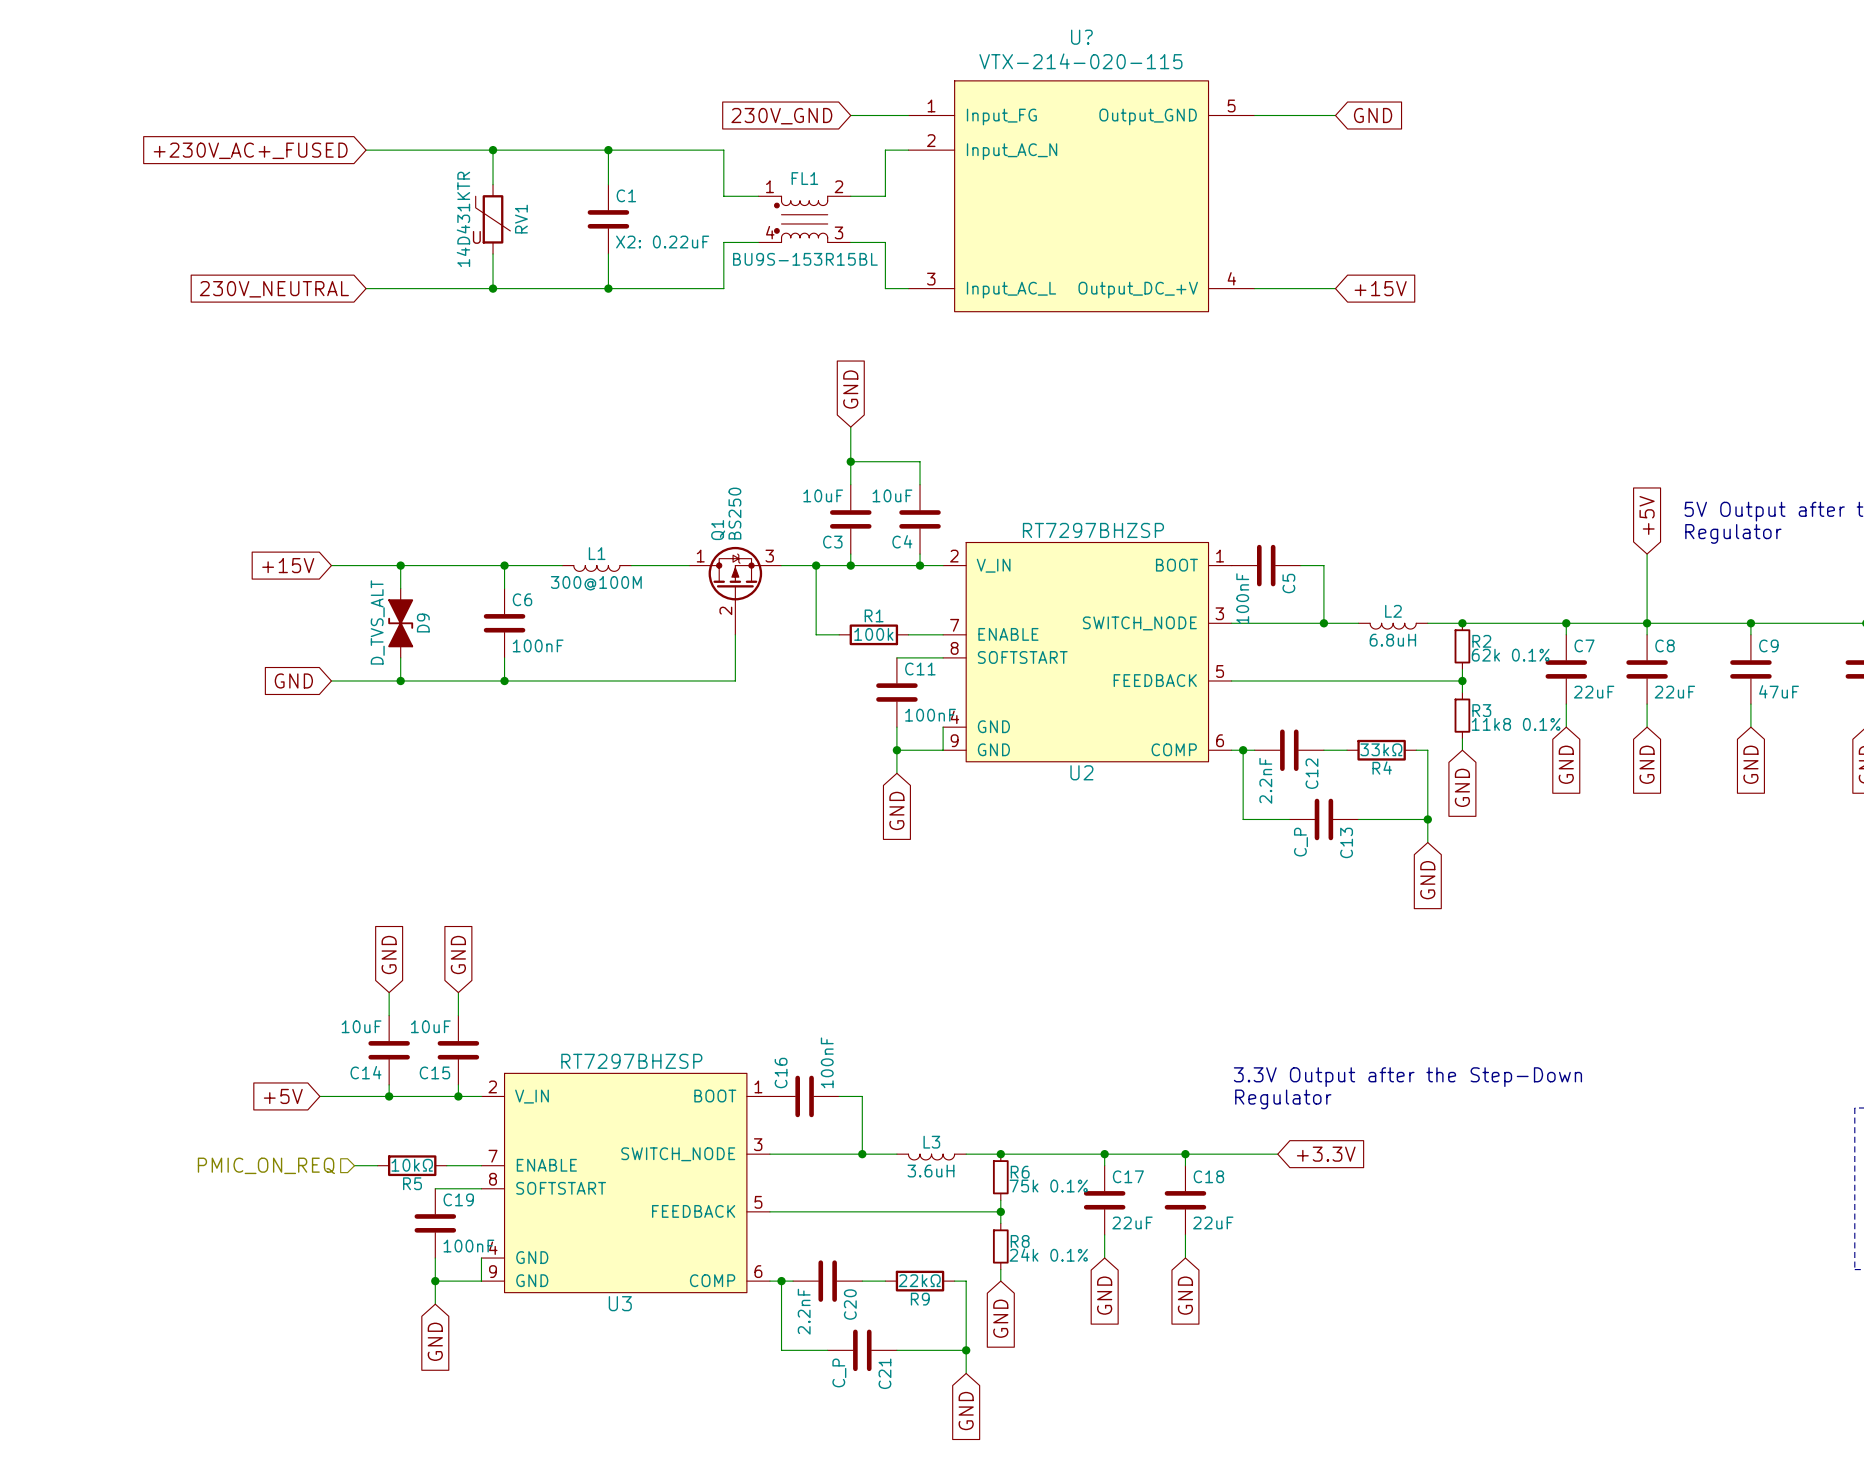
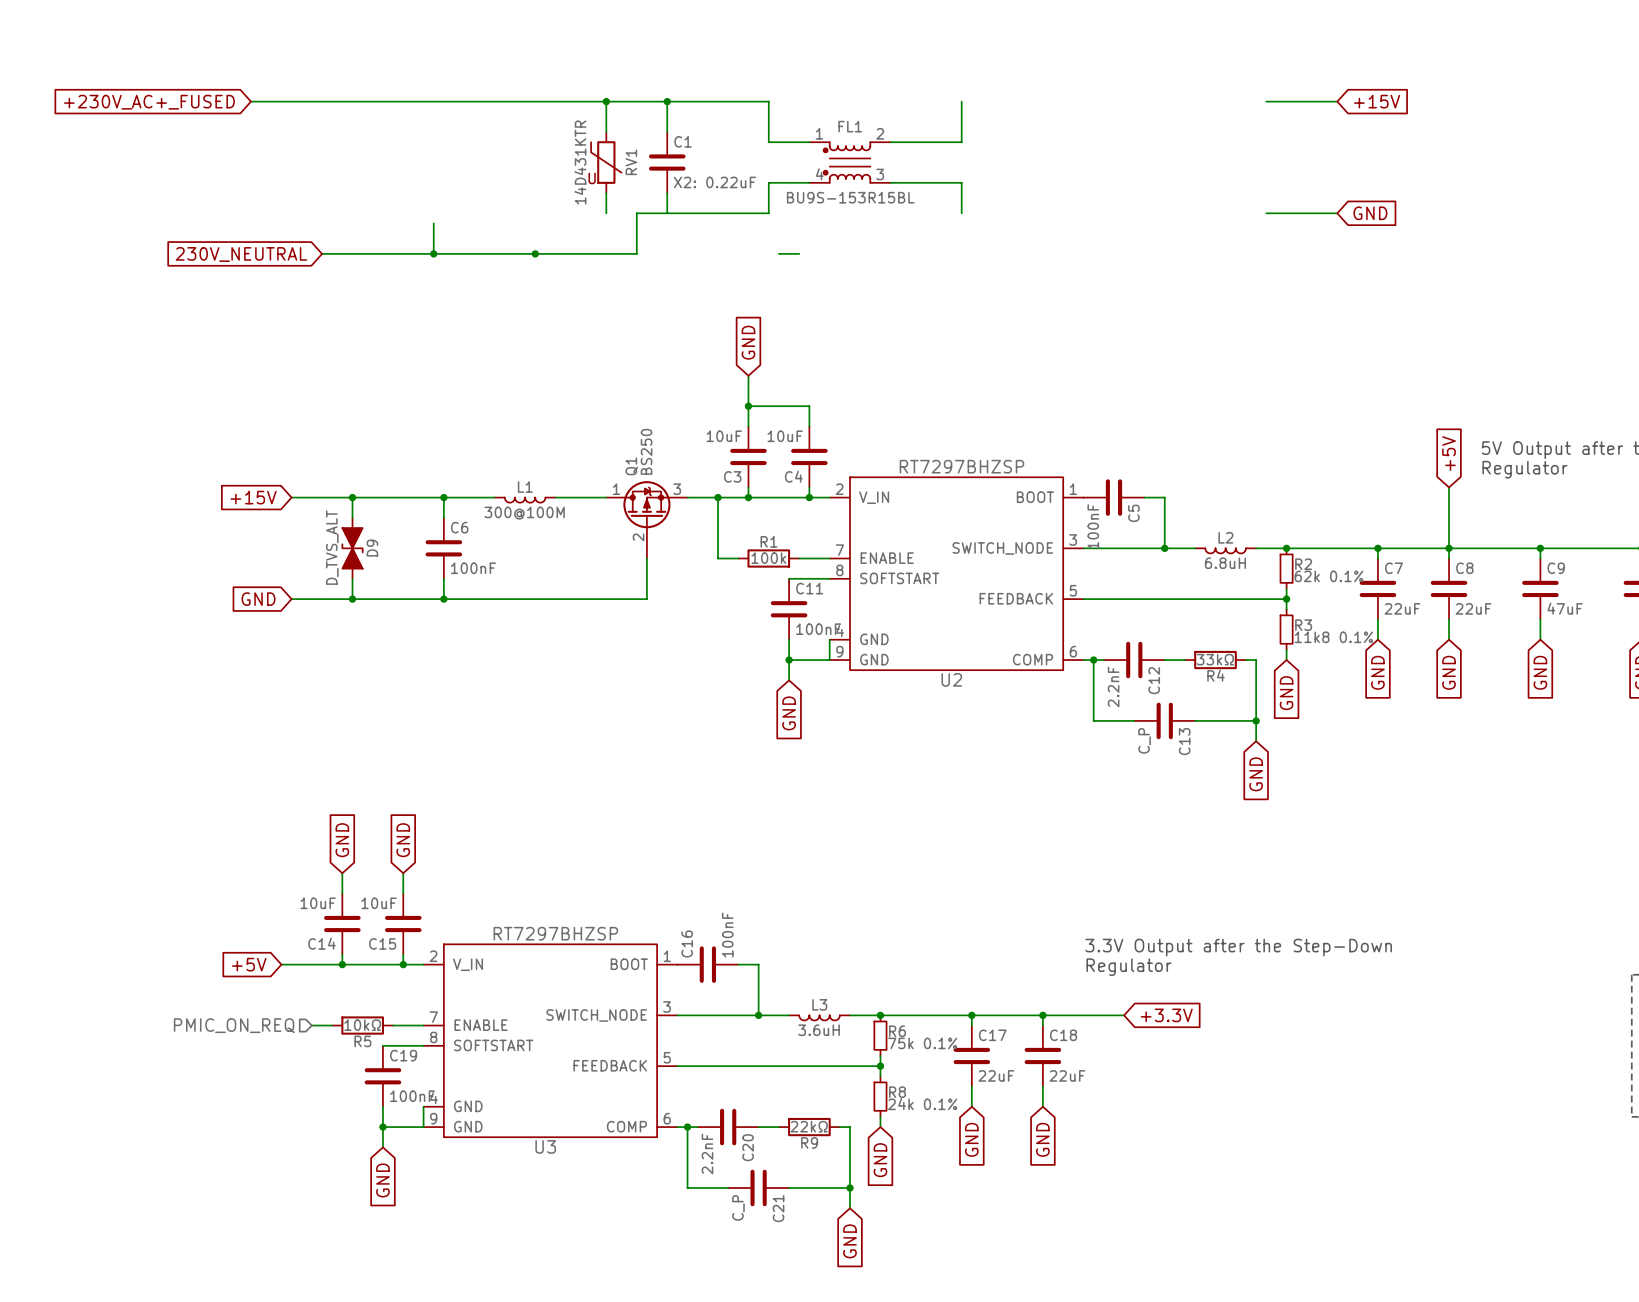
wire: none -> (250, 101) (748, 101)
junction: none -> (606, 101)
junction: none -> (667, 101)
wire: (873, 115) (908, 115) -> (768, 101) (768, 142) (809, 142)
wire: (1254, 115) (1335, 115) -> (1266, 101) (1337, 101)
global label position: GND (1373, 115) -> GND (1370, 213)
global label: none -> +15V (1377, 101)
global label: 230V_GND (781, 116) -> none
global label position: +230V_AC+_FUSED (250, 150) -> +230V_AC+_FUSED (149, 102)
wire: (366, 150) (723, 150) (723, 196) (758, 196) -> none
wire: (493, 150) (493, 184) -> none
junction: (493, 150) -> none
wire: (608, 150) (608, 184) -> (606, 101) (606, 132)
junction: (608, 150) -> none
wire: (908, 150) (885, 150) (885, 196) (850, 196) -> none
U?: VTX-214-020-115 (1081, 196) -> none
RV1 position: (493, 219) -> (606, 162)
C1 position: (608, 219) -> (667, 162)
wire: none -> (606, 192) (606, 213)
wire: none -> (667, 192) (667, 213) (748, 213)
FL1 position: (804, 219) -> (850, 162)
wire: (873, 242) (885, 242) (885, 288) -> (768, 213) (768, 182) (809, 182)
wire: (608, 253) (608, 288) -> (667, 101) (667, 132)
wire: (1254, 288) (1335, 288) -> (1266, 213) (1337, 213)
global label: +15V (1380, 288) -> none

